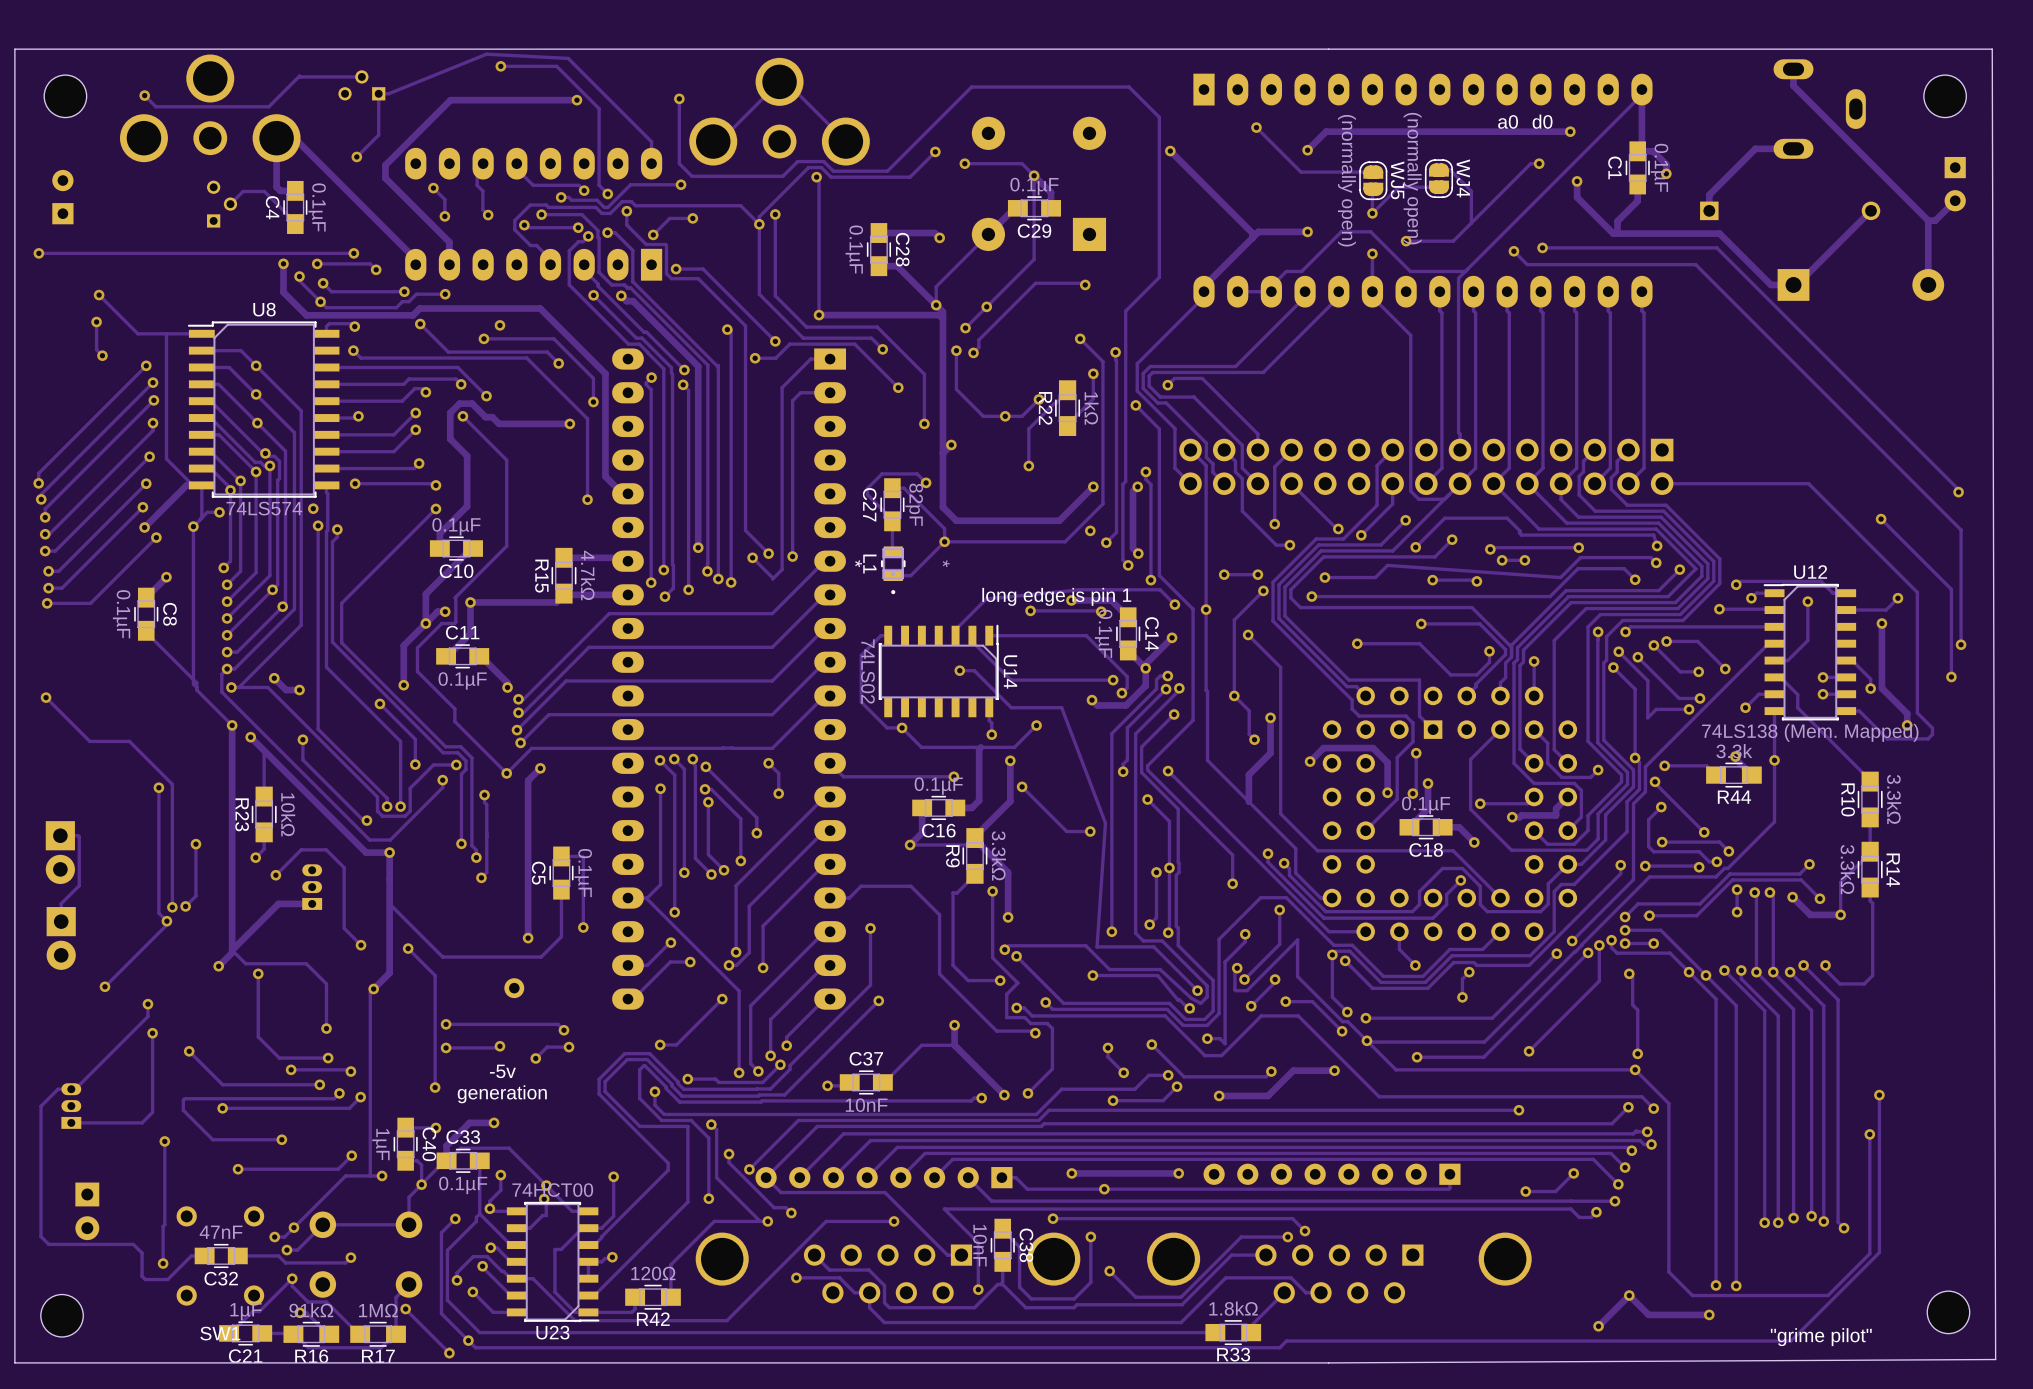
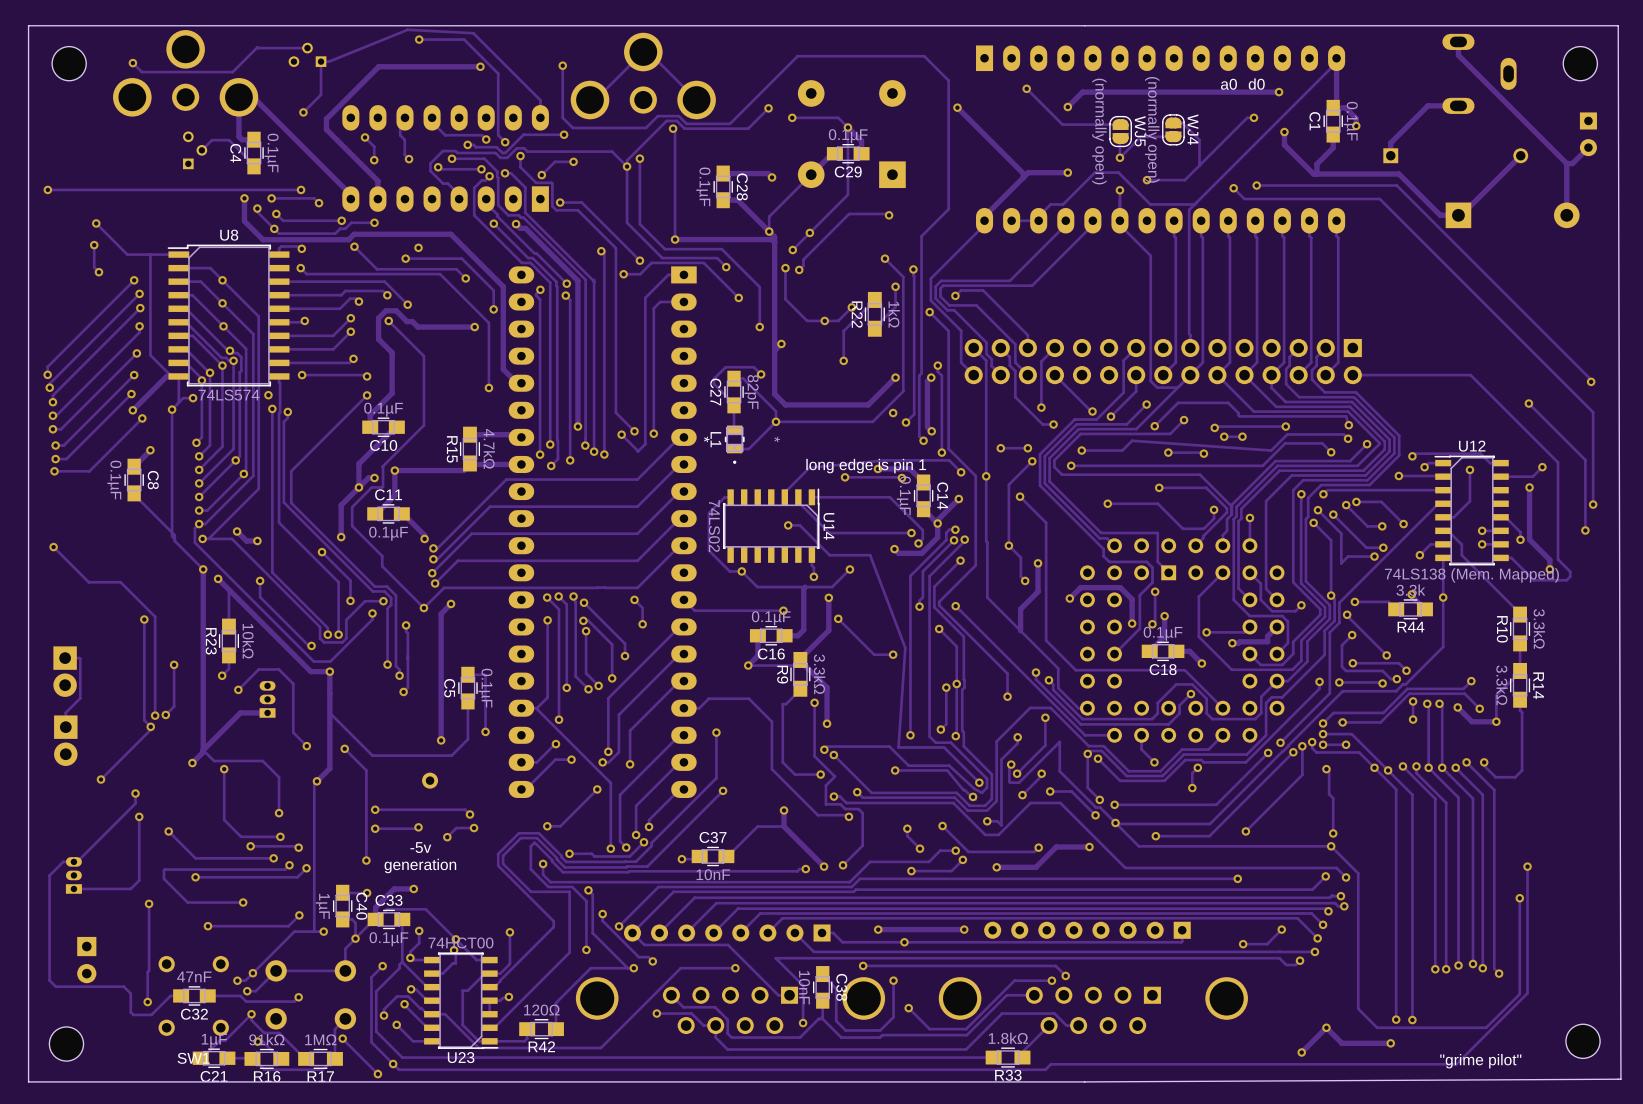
part: (62, 197) -> none

